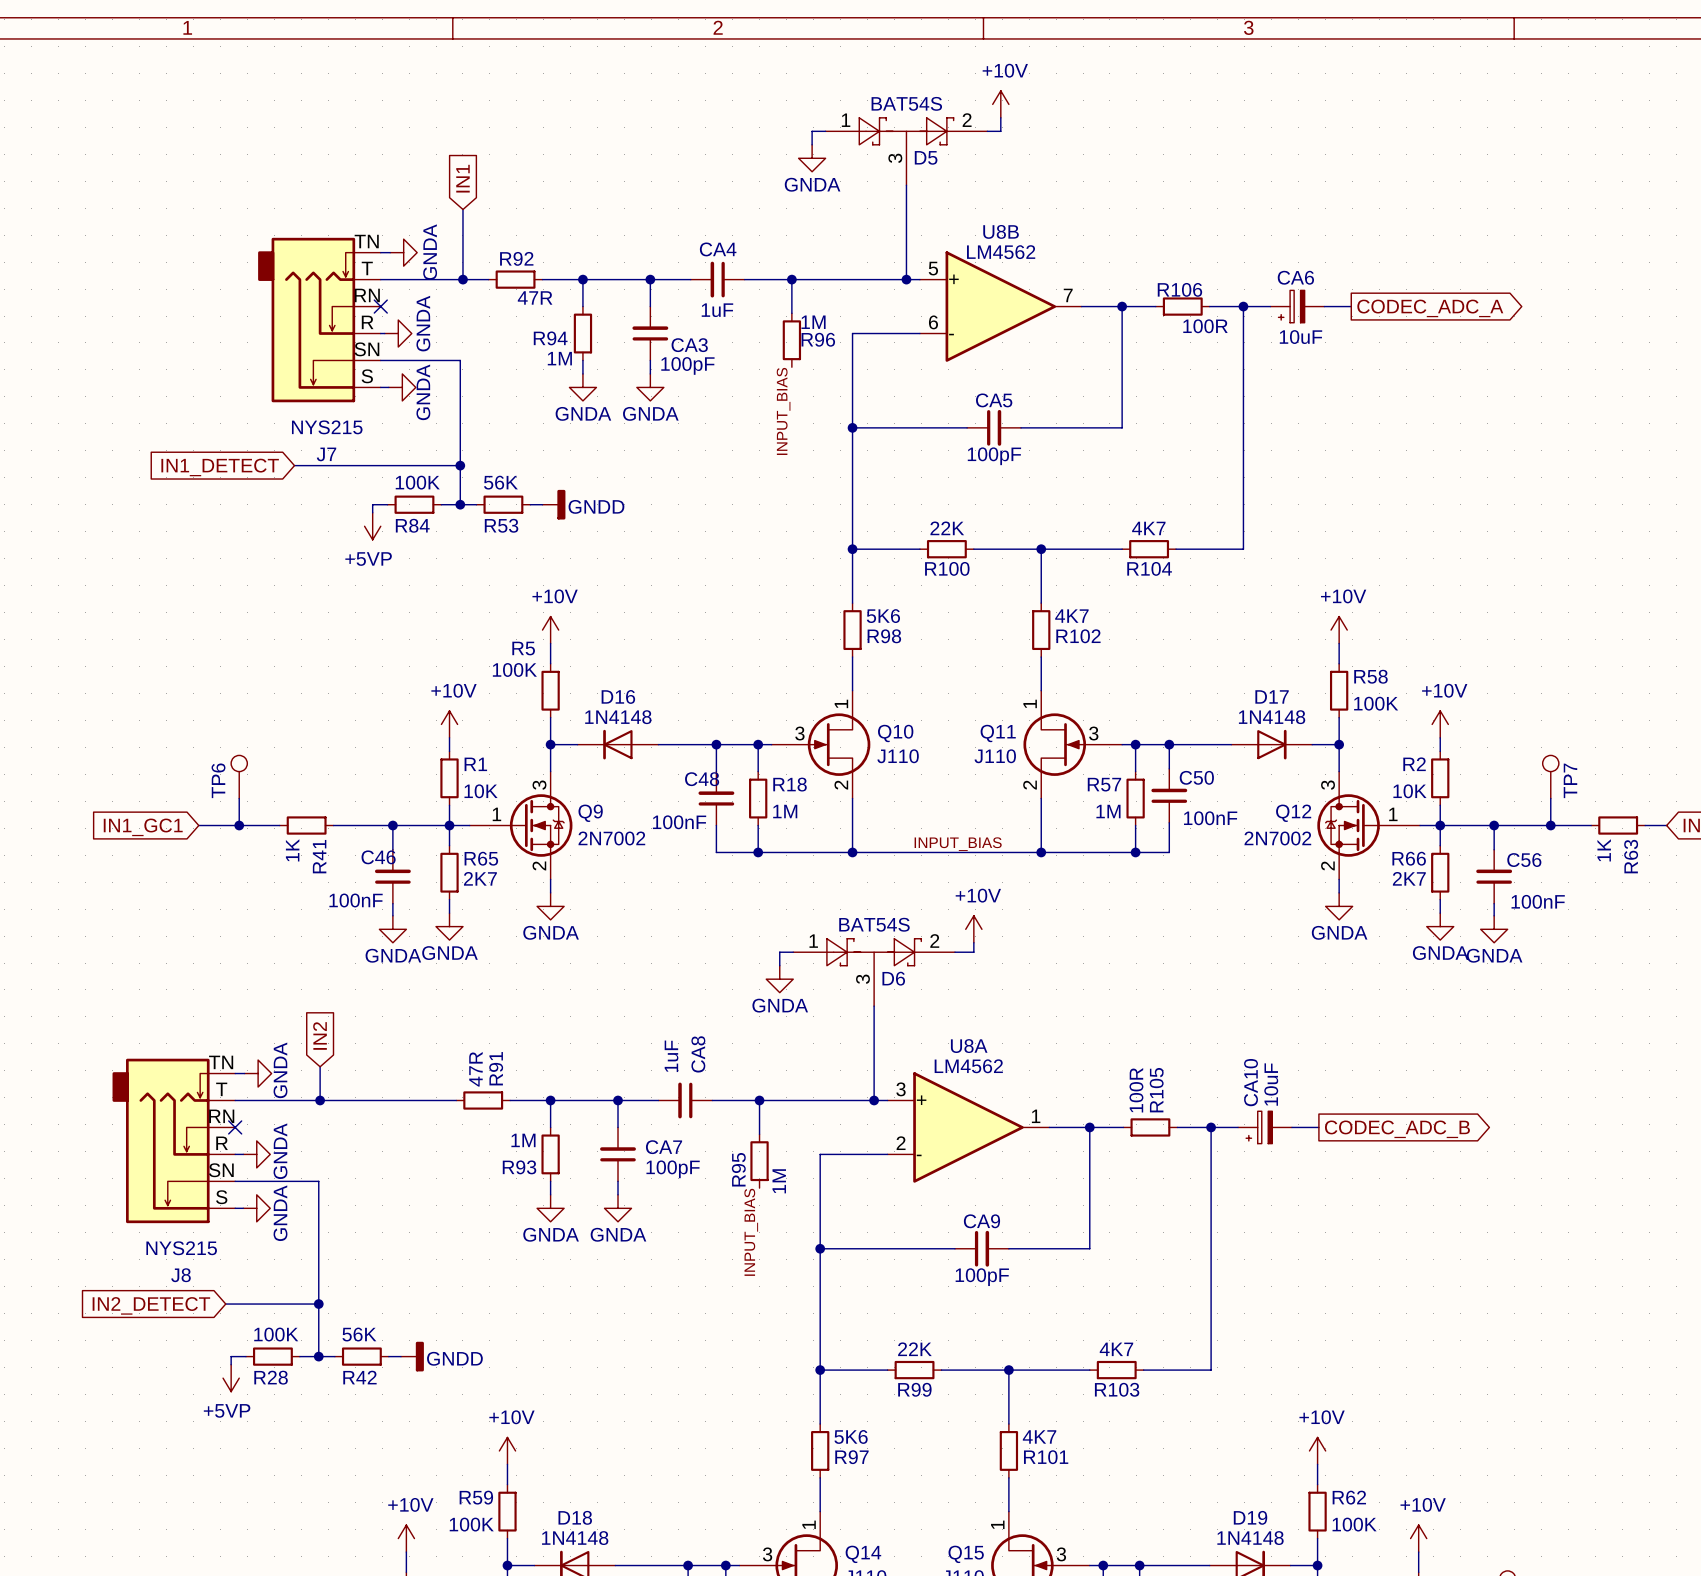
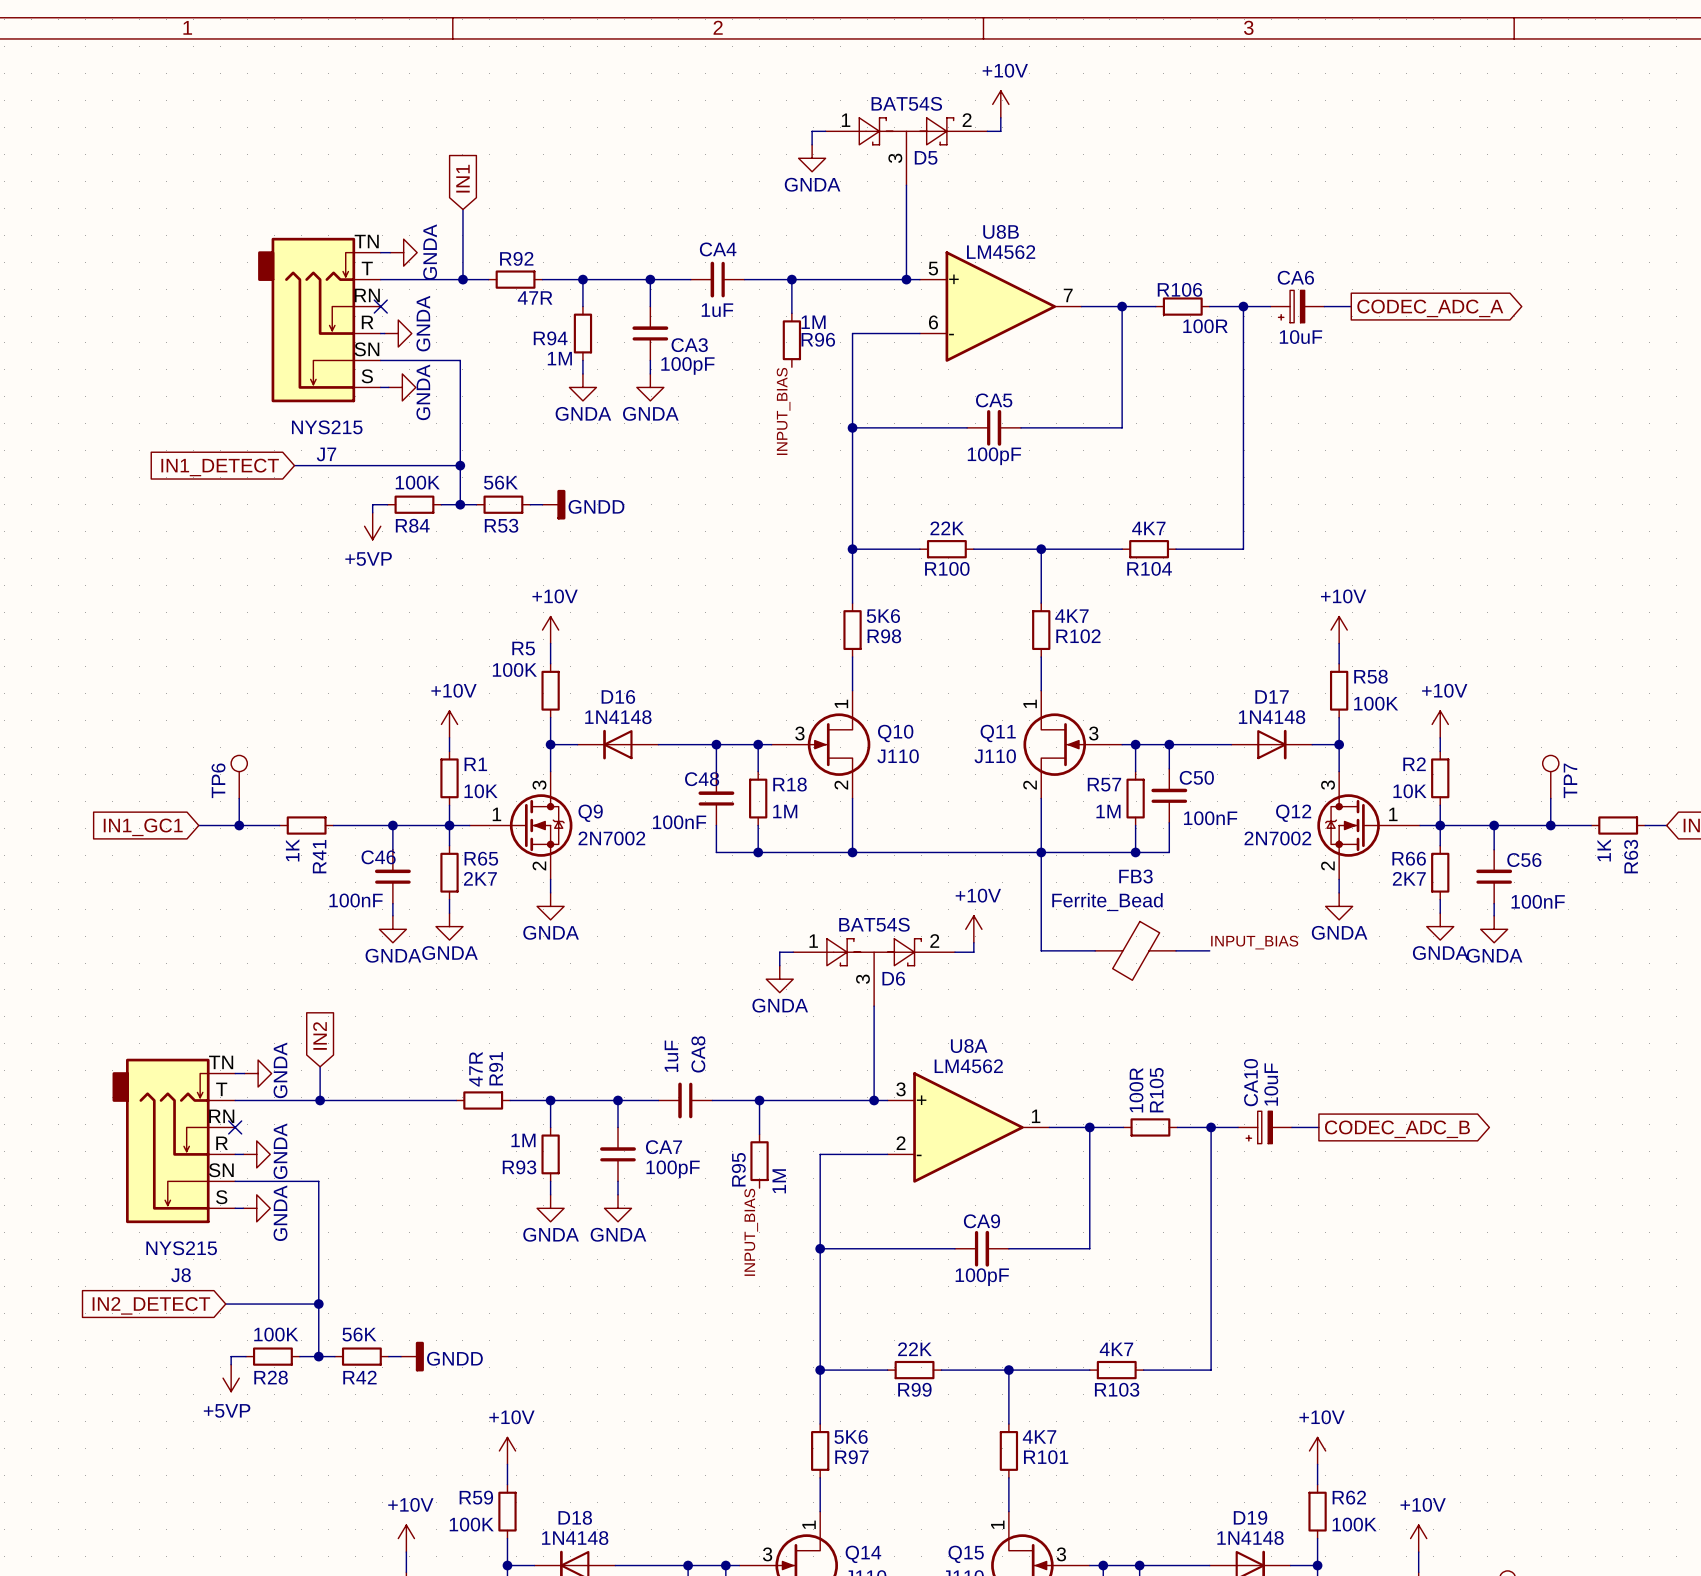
label: INPUT_BIAS (958, 844) -> none
wire: none -> (1041, 852) (1041, 950) (1095, 950)
label: none -> INPUT_BIAS (1254, 942)
FB3: none -> Ferrite_Bead (1135, 950)
wire: none -> (1176, 950) (1209, 950)

